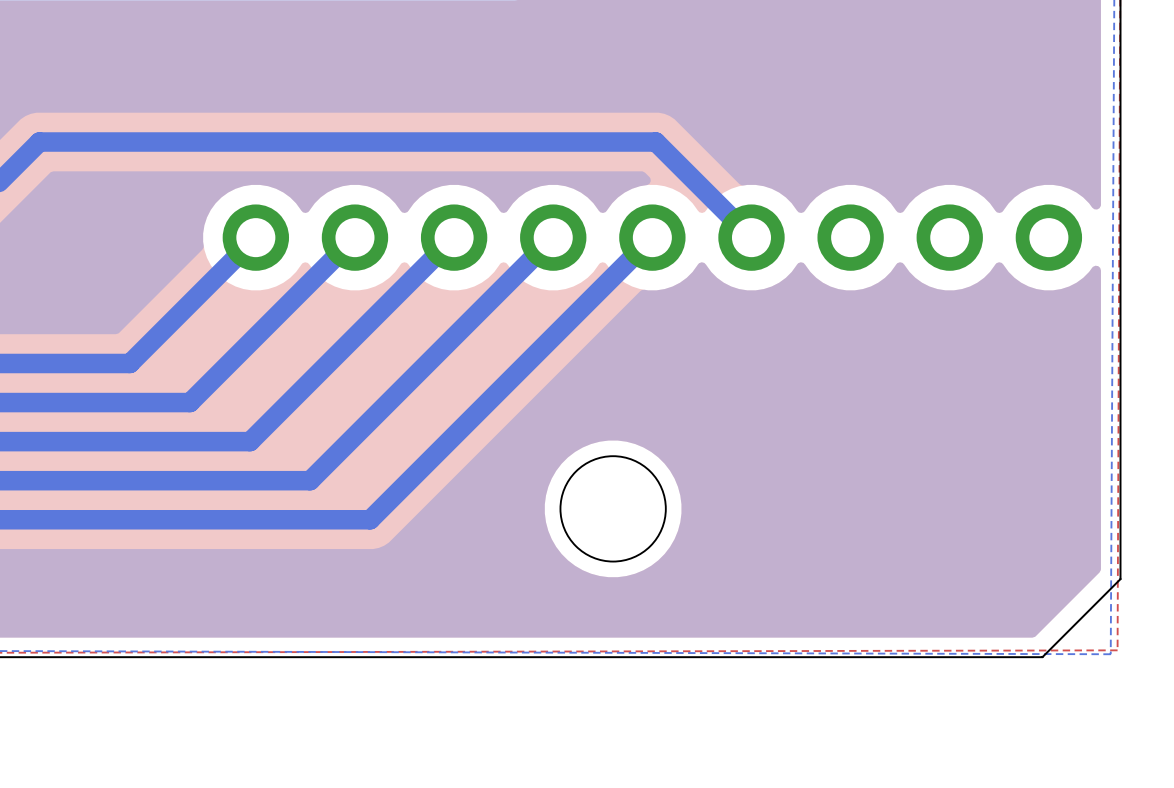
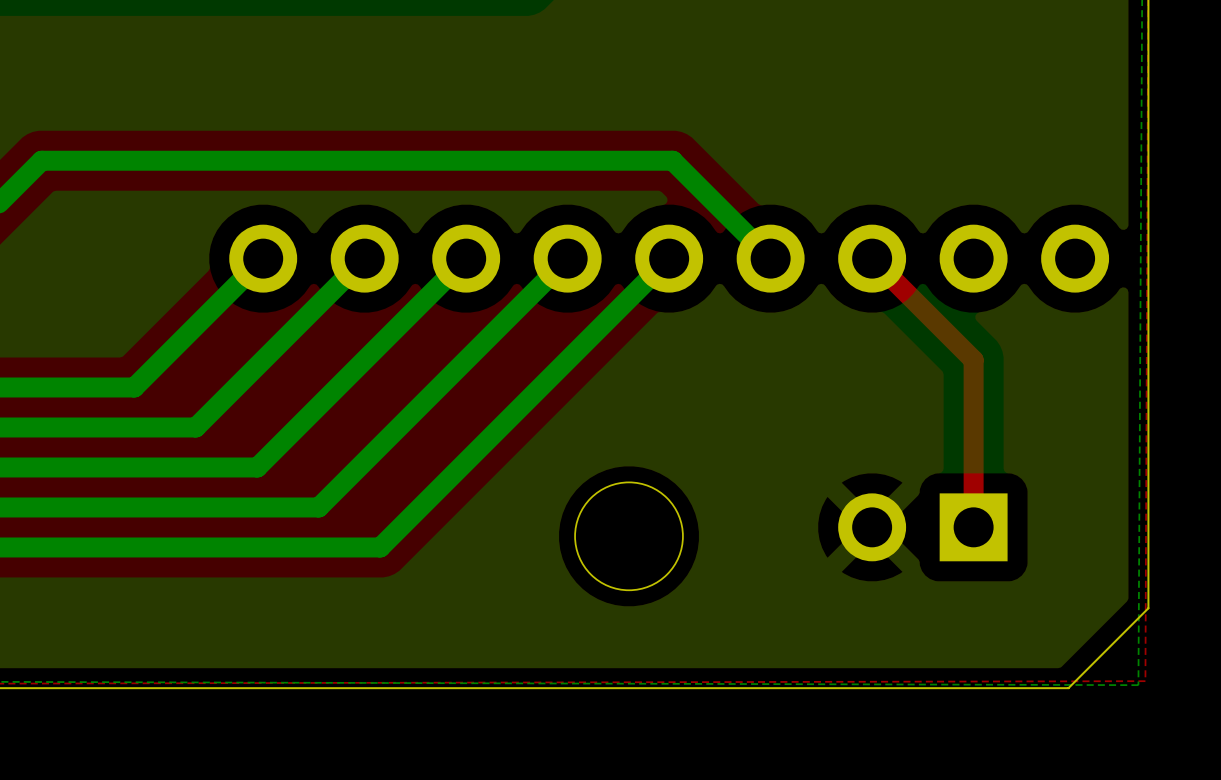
top track: none -> (872, 258) (973, 360) (973, 527)
part: none -> (922, 527)

